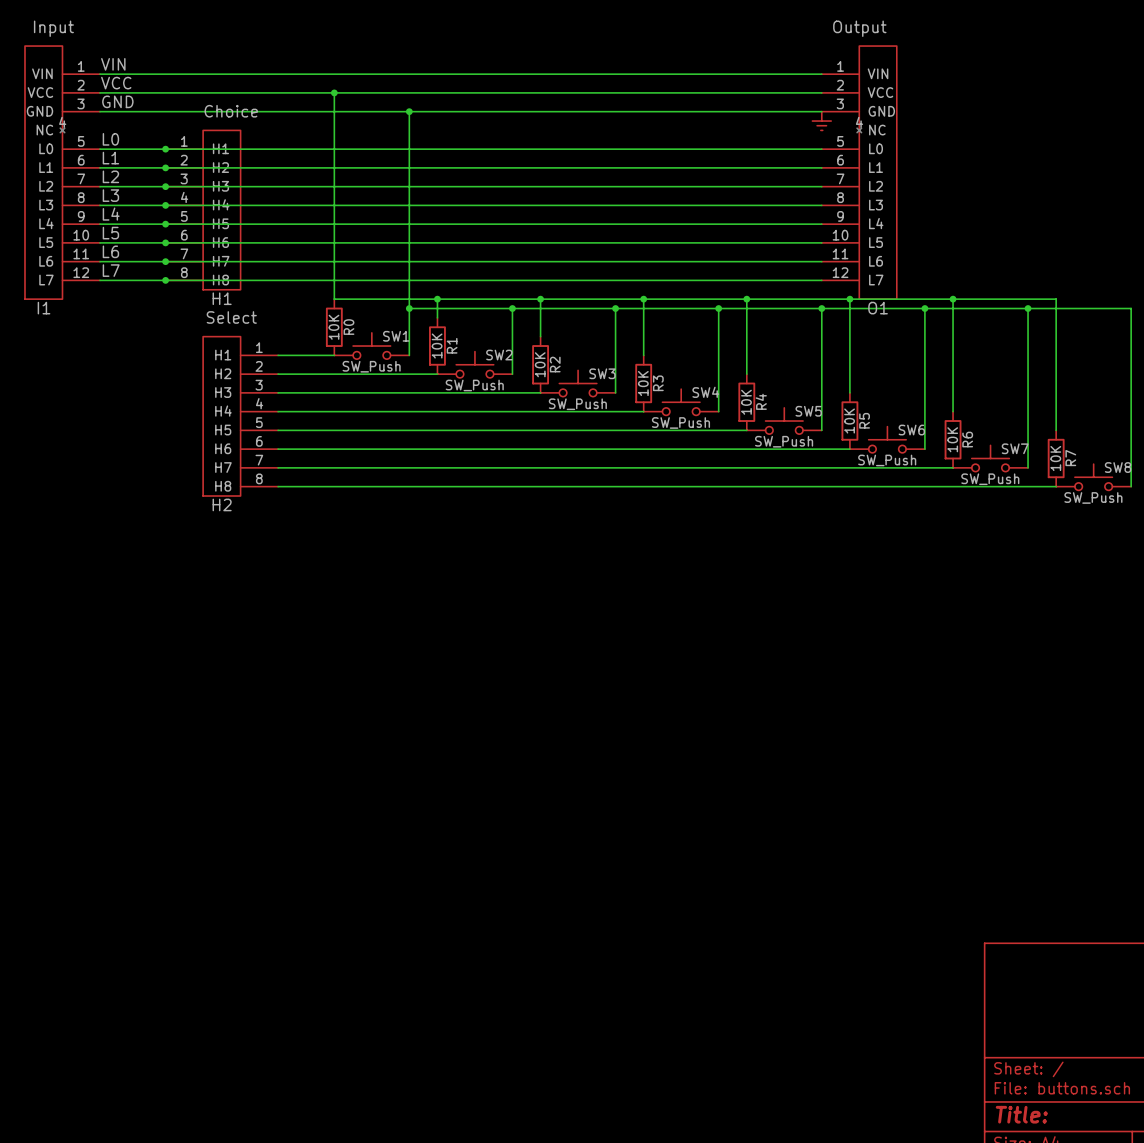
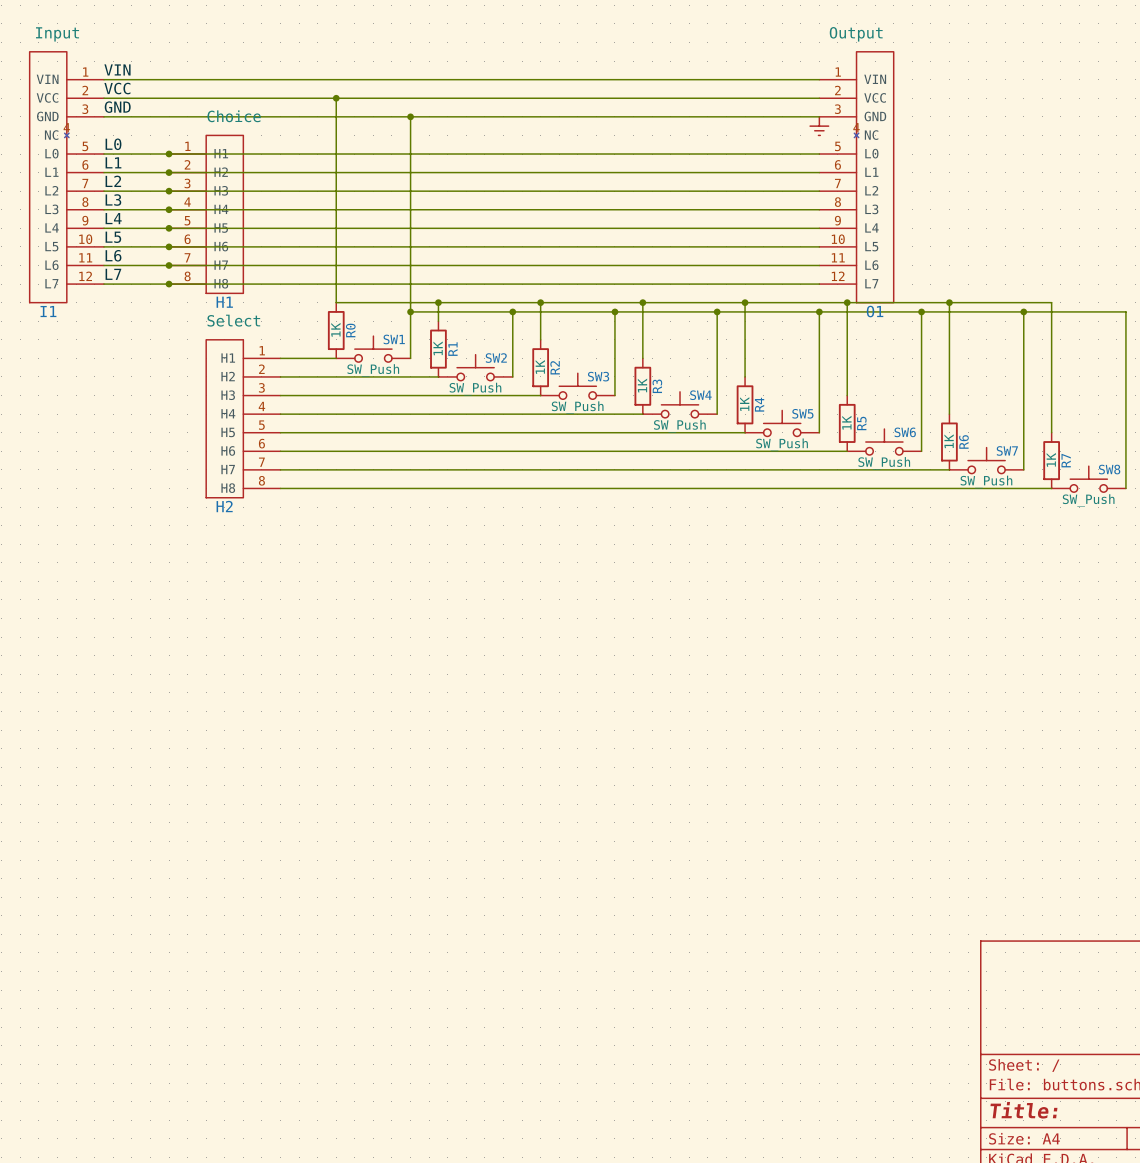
R0 value: 10K (333, 327) -> 1K (335, 329)
R1 value: 10K (437, 346) -> 1K (438, 348)
R2 value: 10K (540, 364) -> 1K (540, 366)
R3 value: 10K (643, 383) -> 1K (642, 385)
R4 value: 10K (746, 402) -> 1K (744, 404)
R5 value: 10K (849, 421) -> 1K (846, 422)
R6 value: 10K (952, 439) -> 1K (949, 441)
R7 value: 10K (1055, 458) -> 1K (1051, 459)

